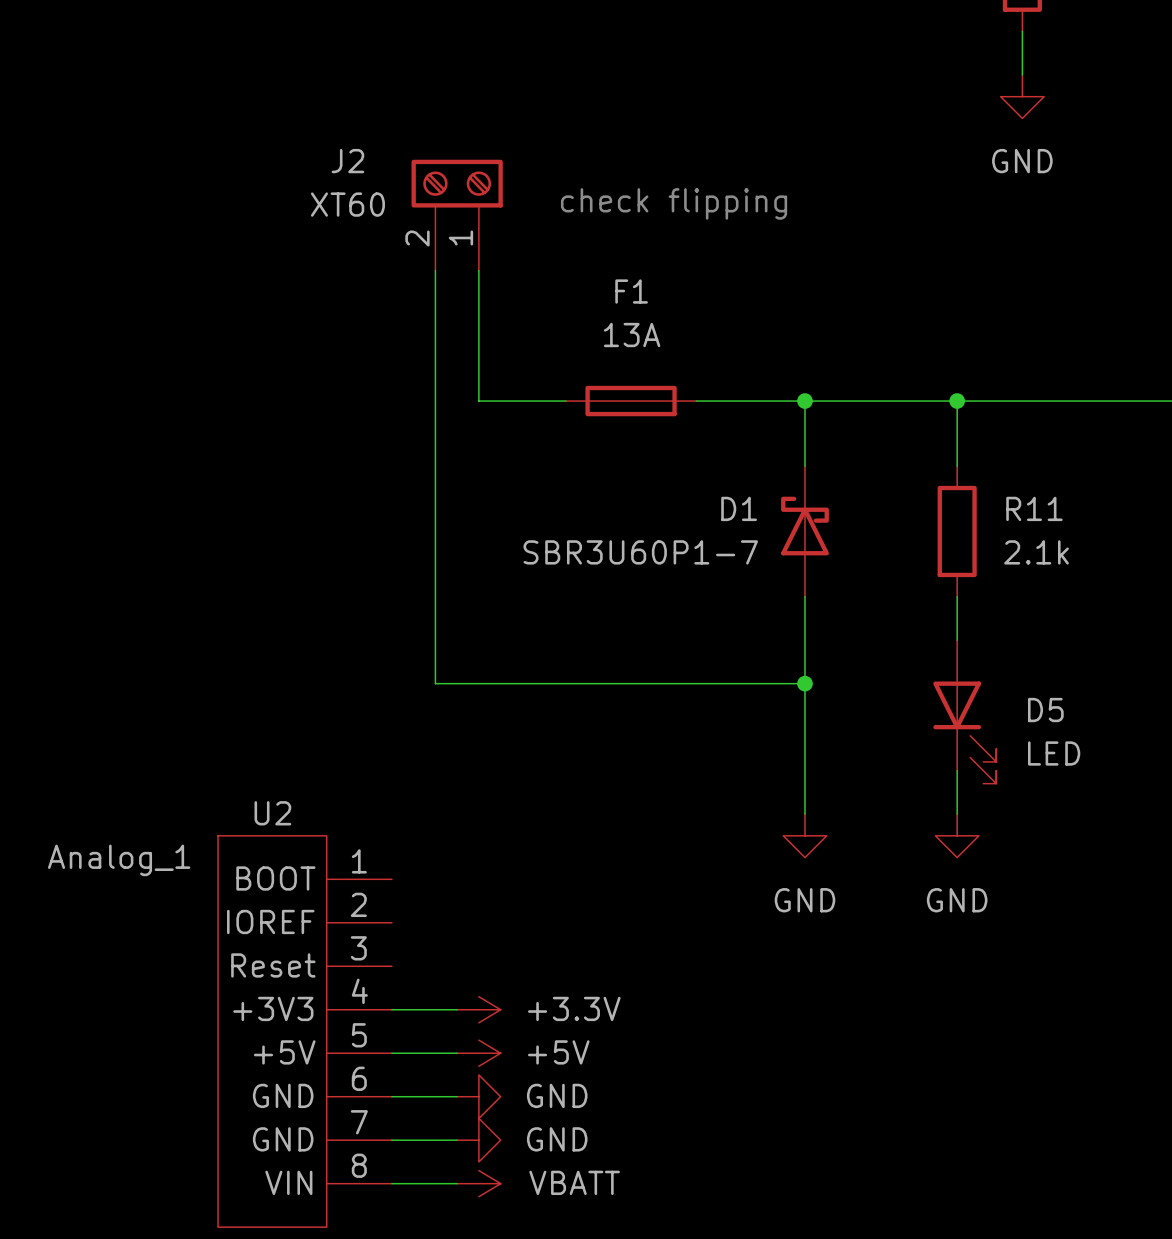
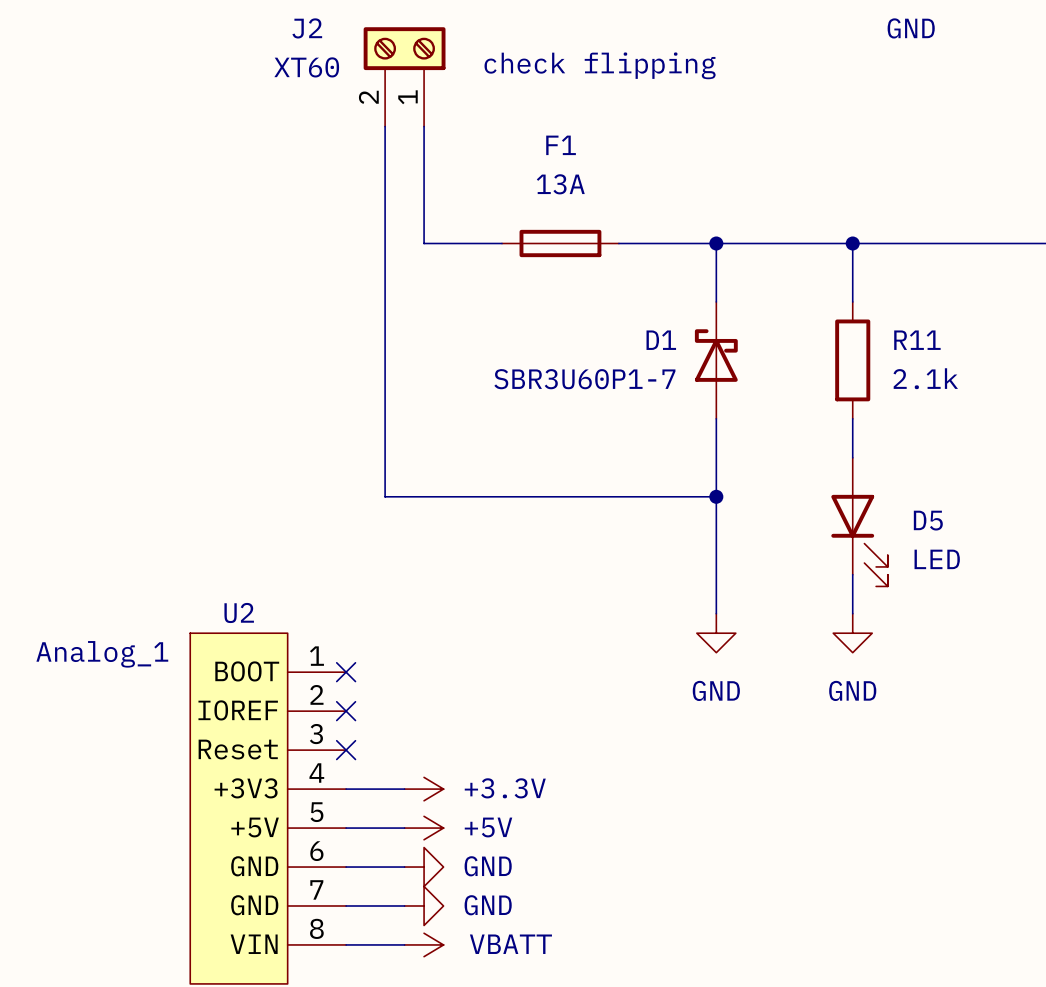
no-connect mark: none -> (346, 672)
no-connect mark: none -> (346, 711)
no-connect mark: none -> (346, 750)

